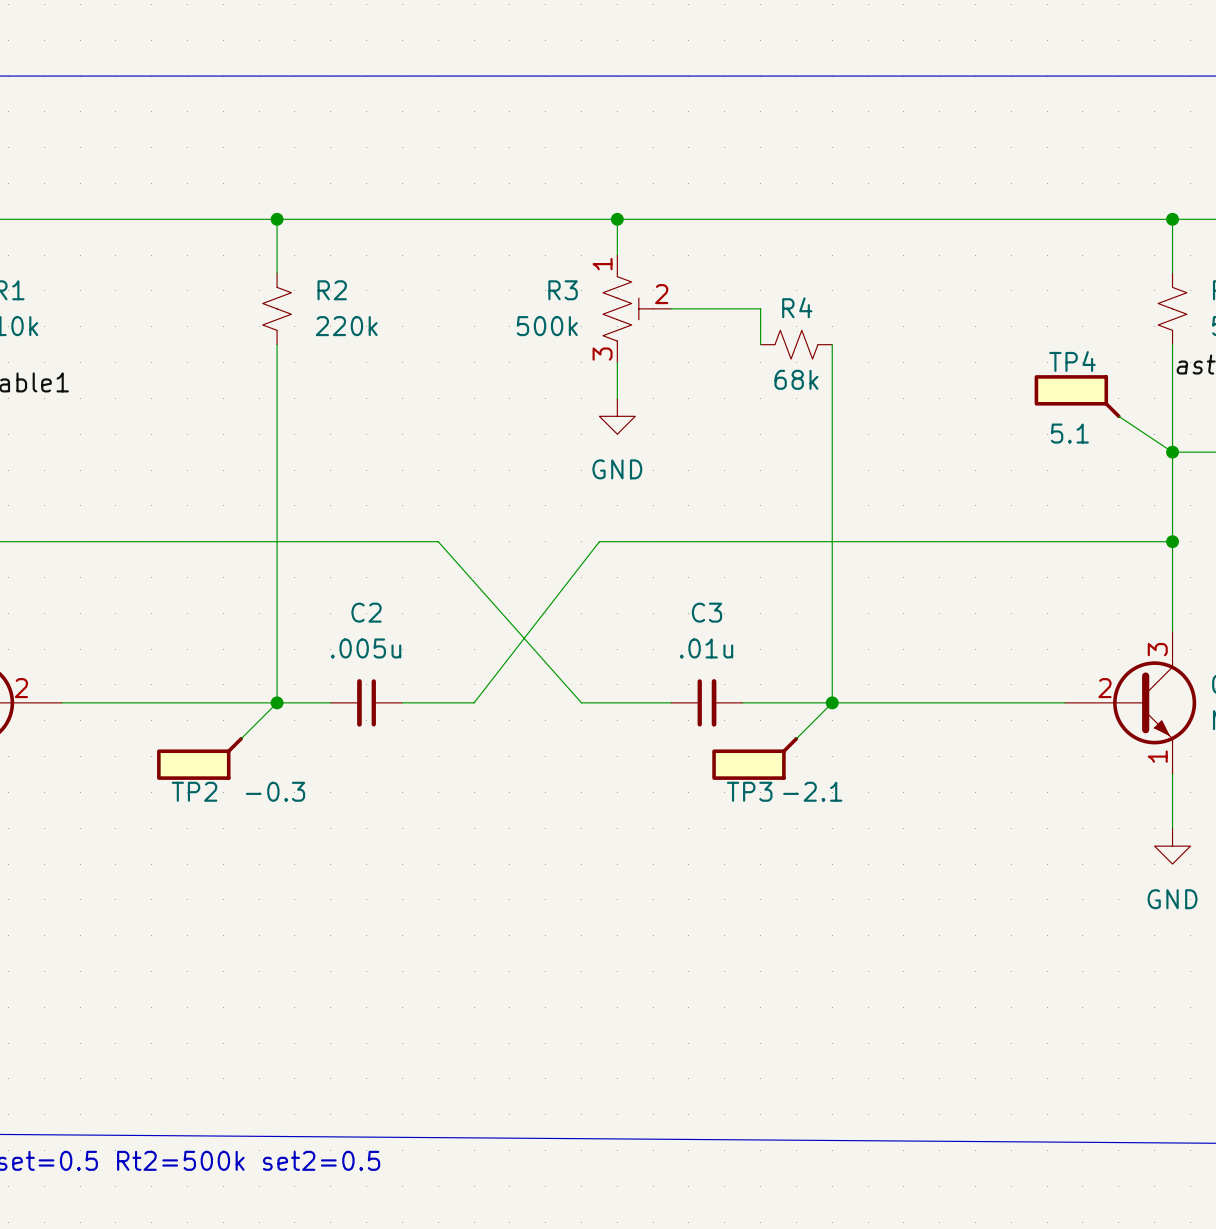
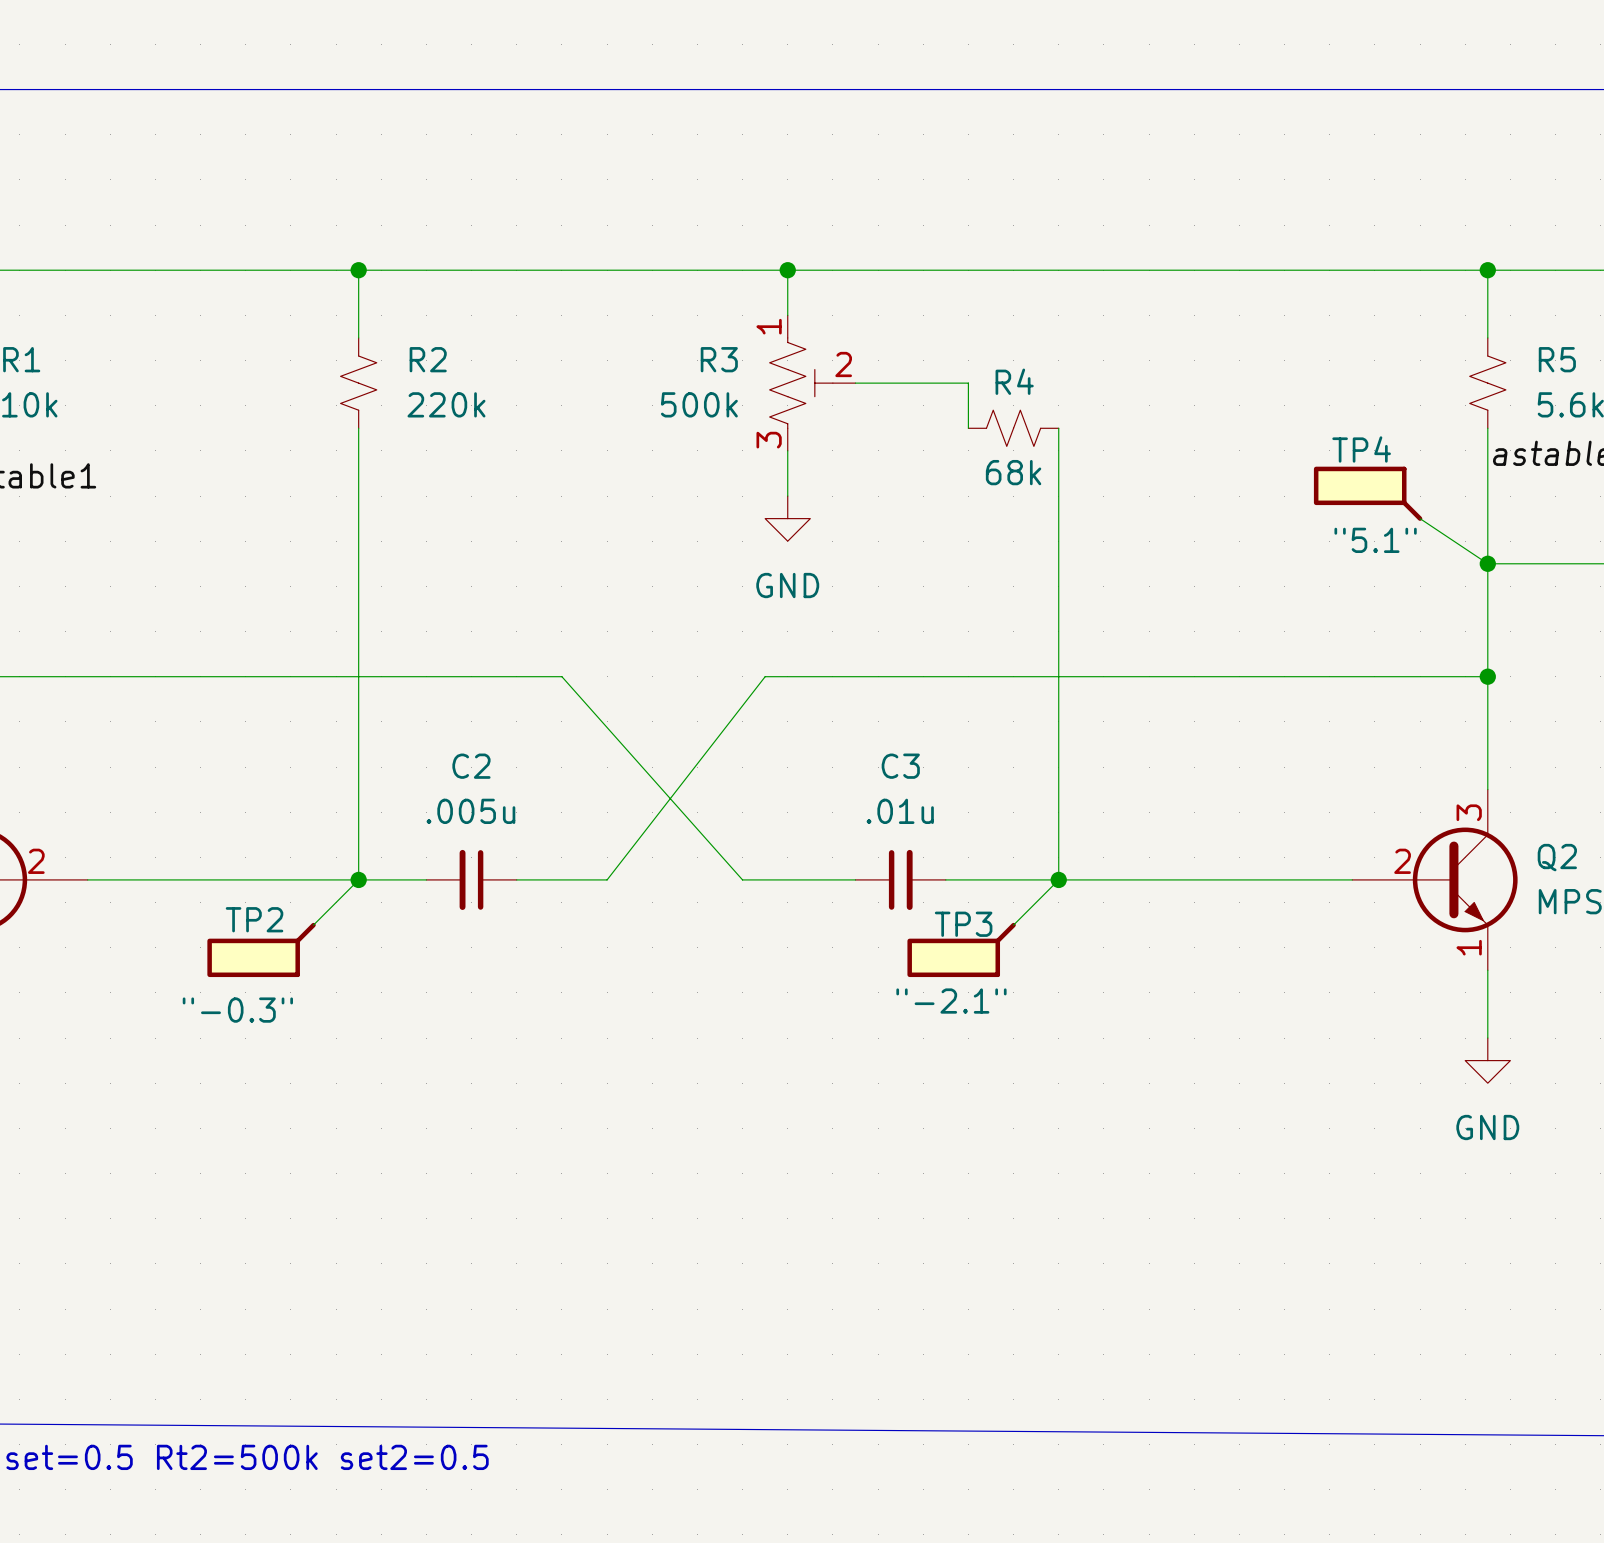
TP4 value: 5.1 (1069, 433) -> "5.1" (1375, 540)
TP2 name position: TP2 (194, 791) -> TP2 (254, 919)
TP2 value: -0.3 (275, 791) -> "-0.3" (237, 1010)
TP3 name position: TP3 (749, 791) -> TP3 (963, 924)
TP3 value: -2.1 (812, 791) -> "-2.1" (951, 1001)

